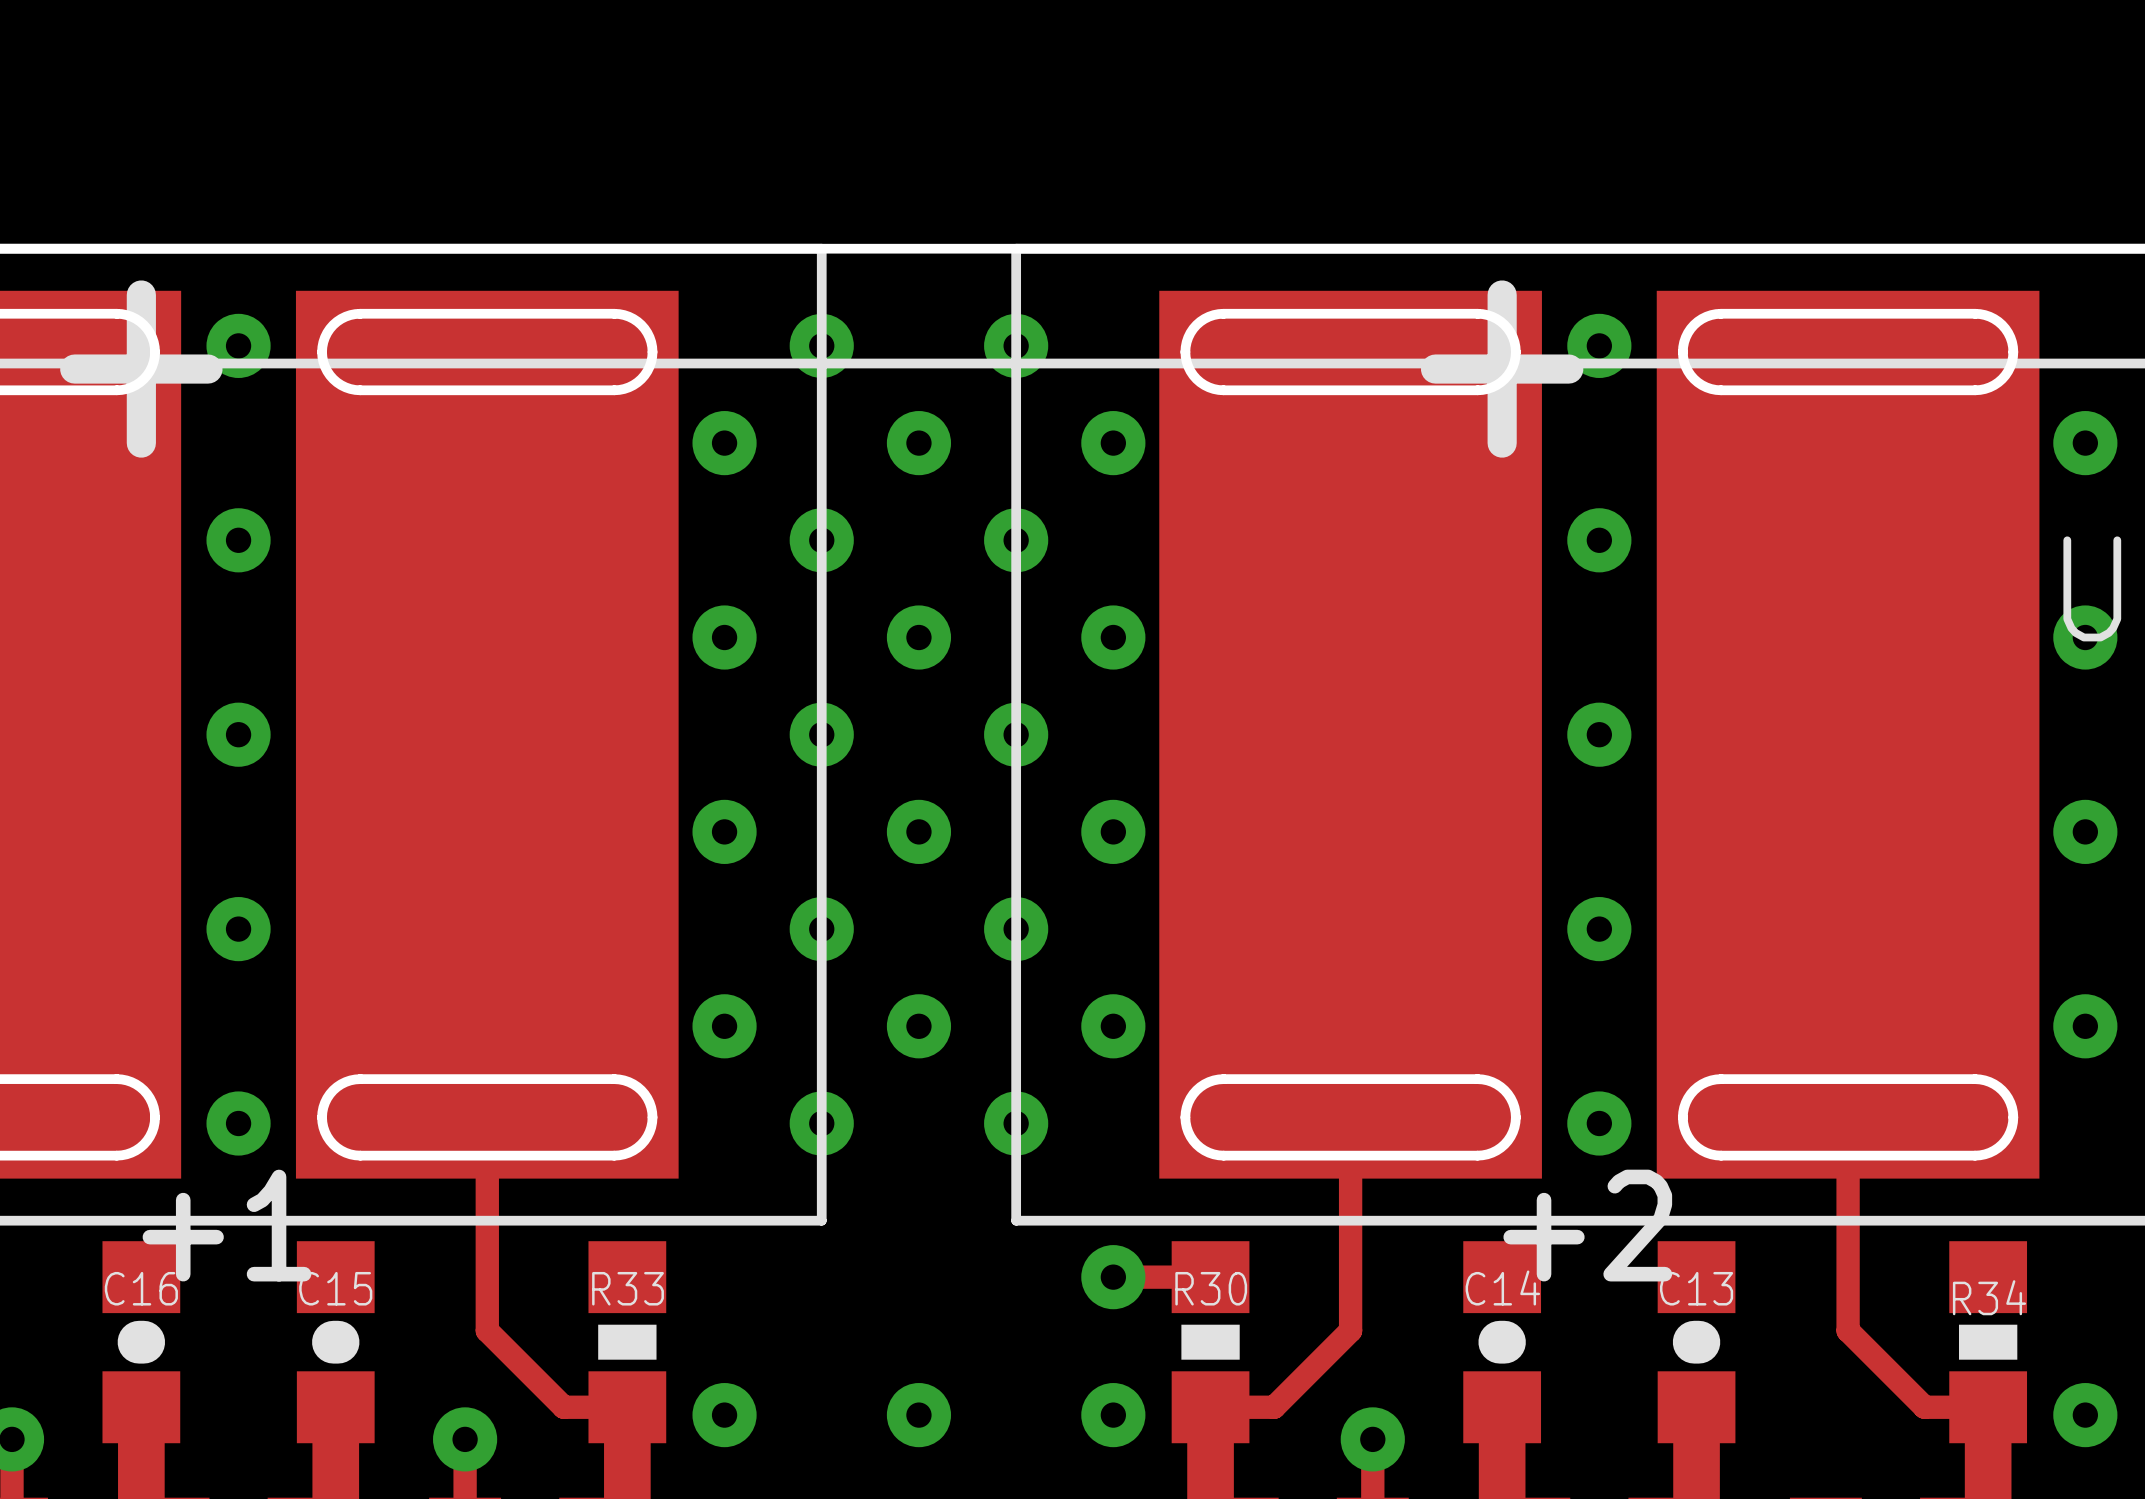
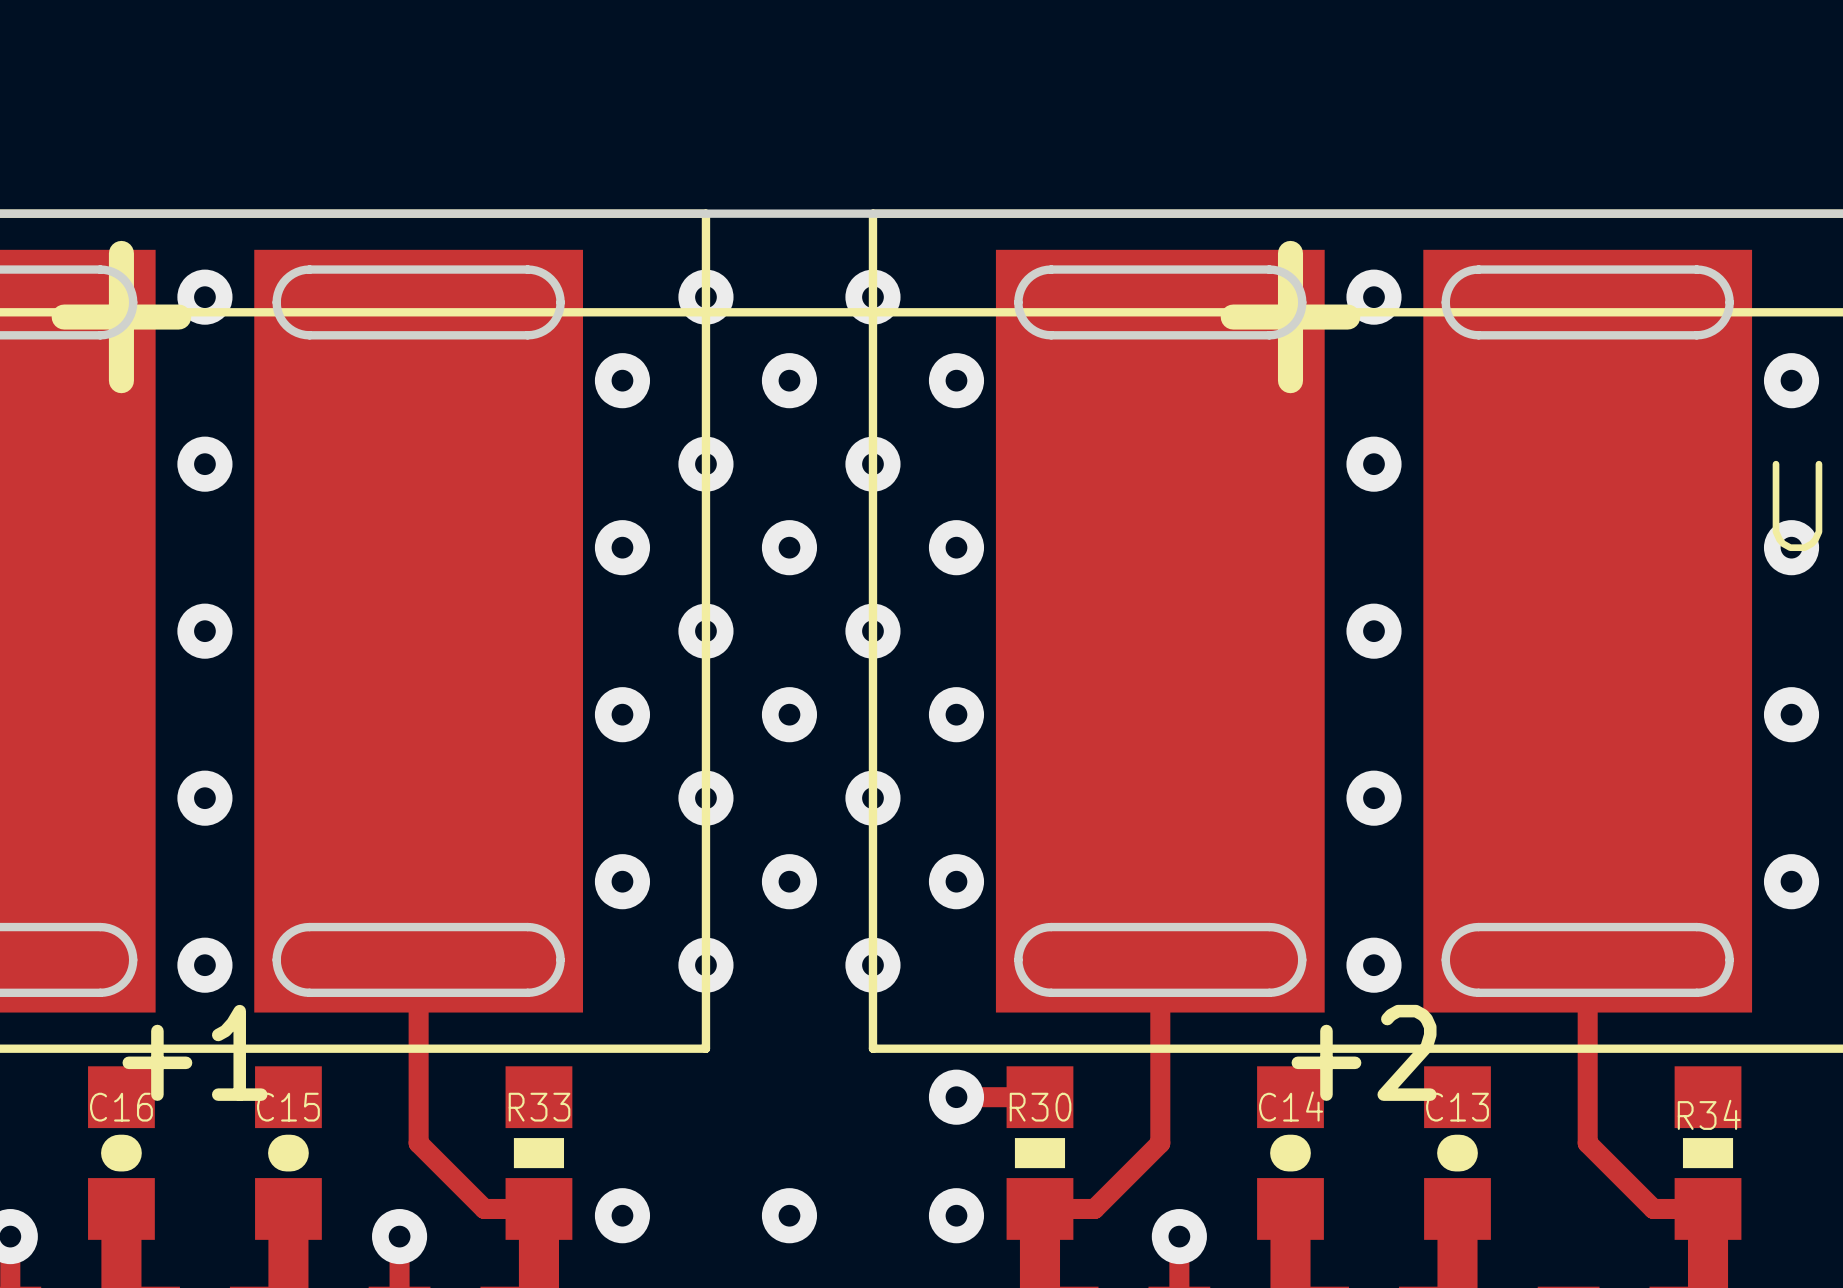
via: (2085, 1415) -> none

